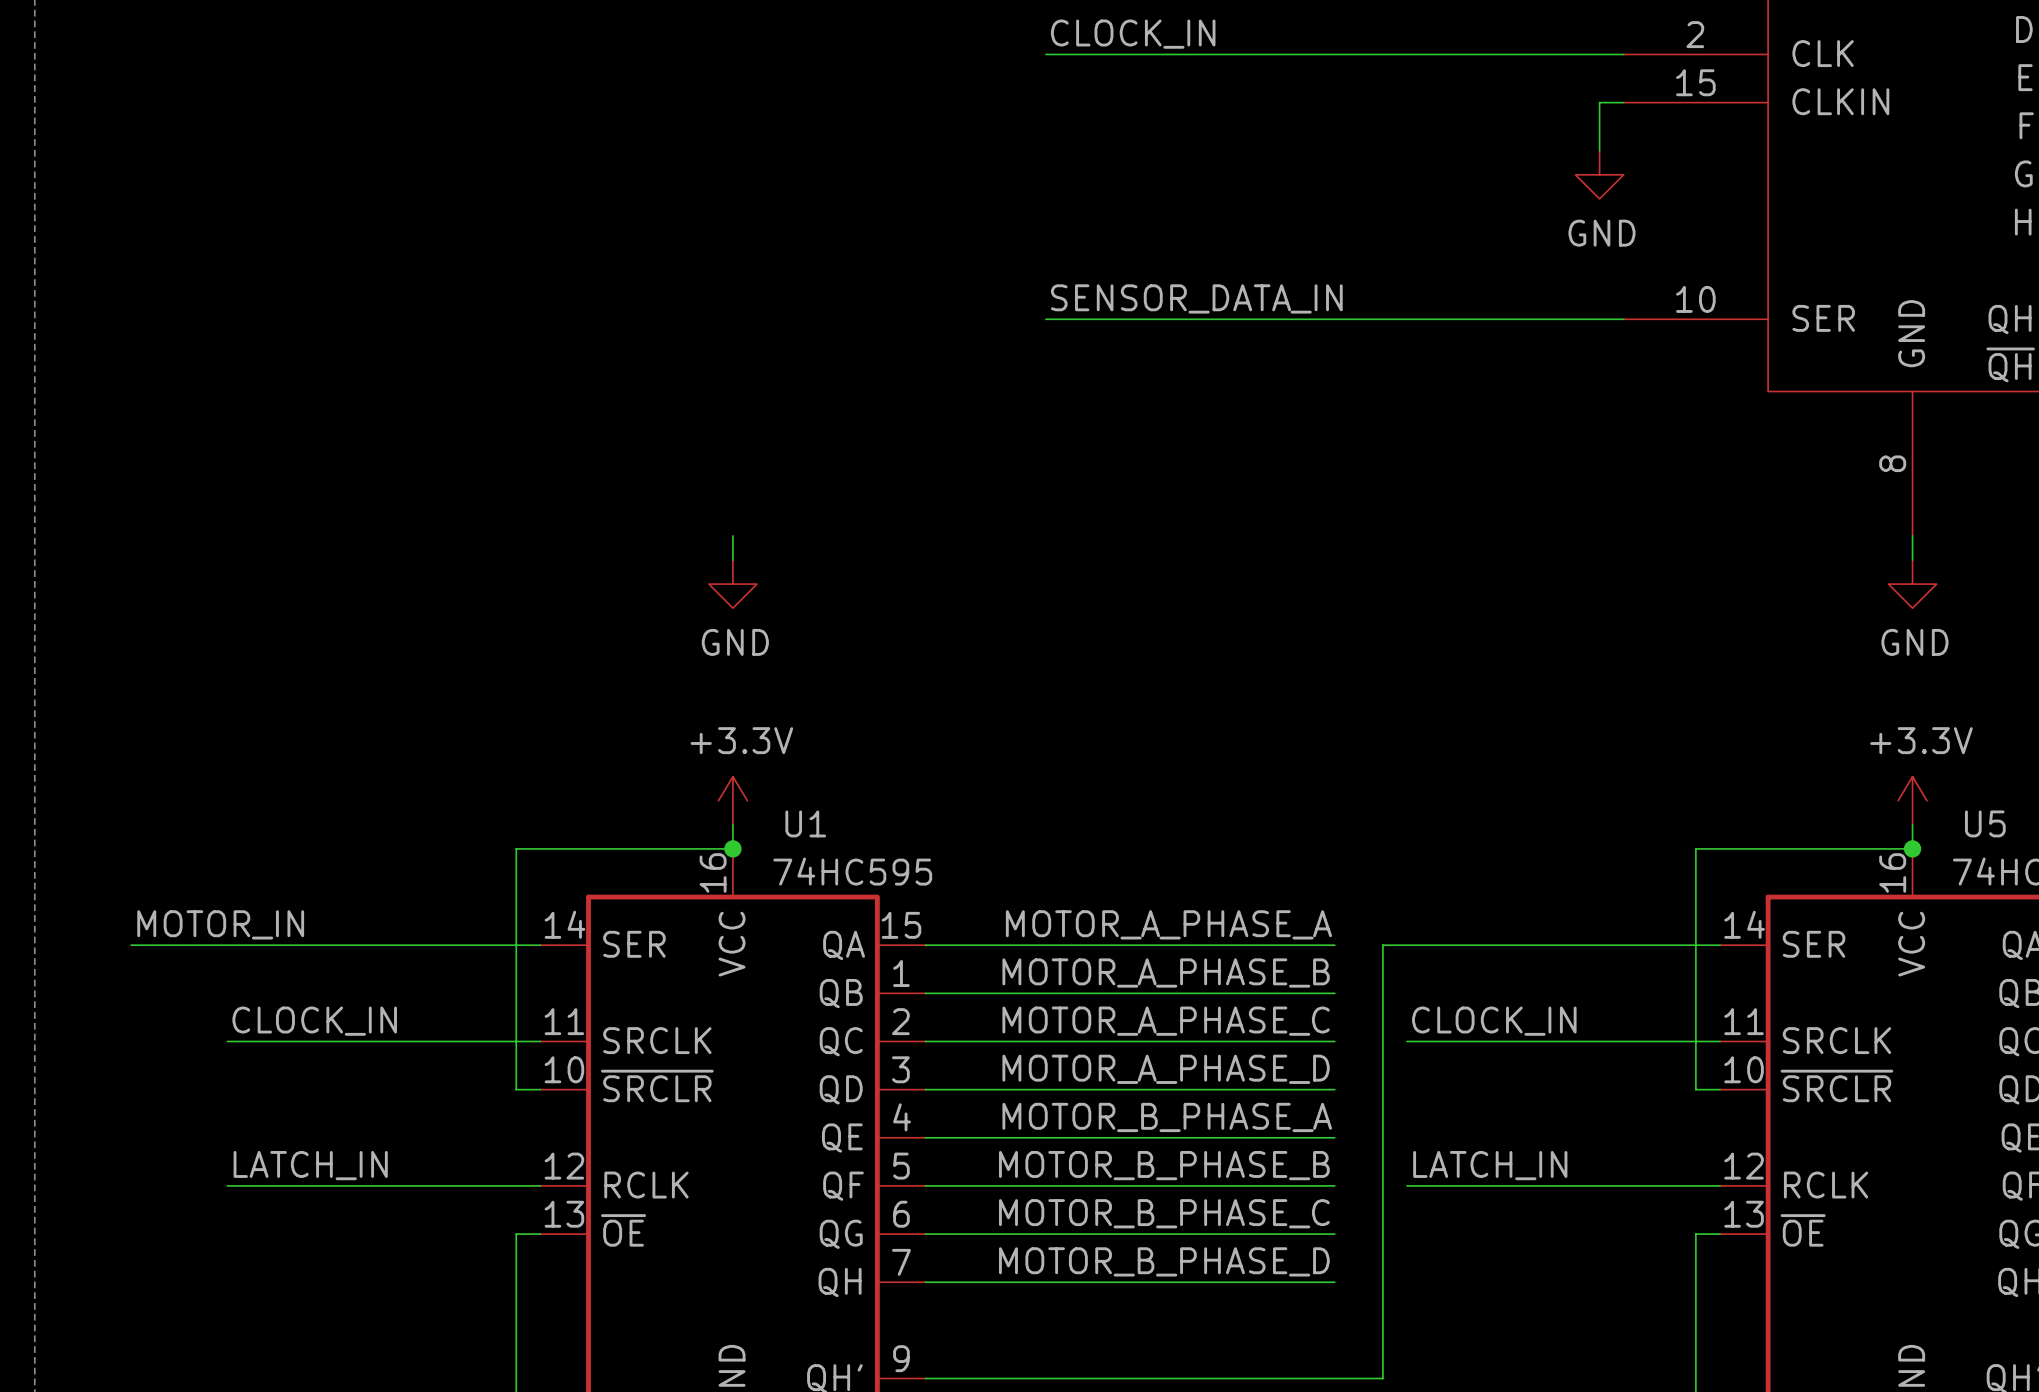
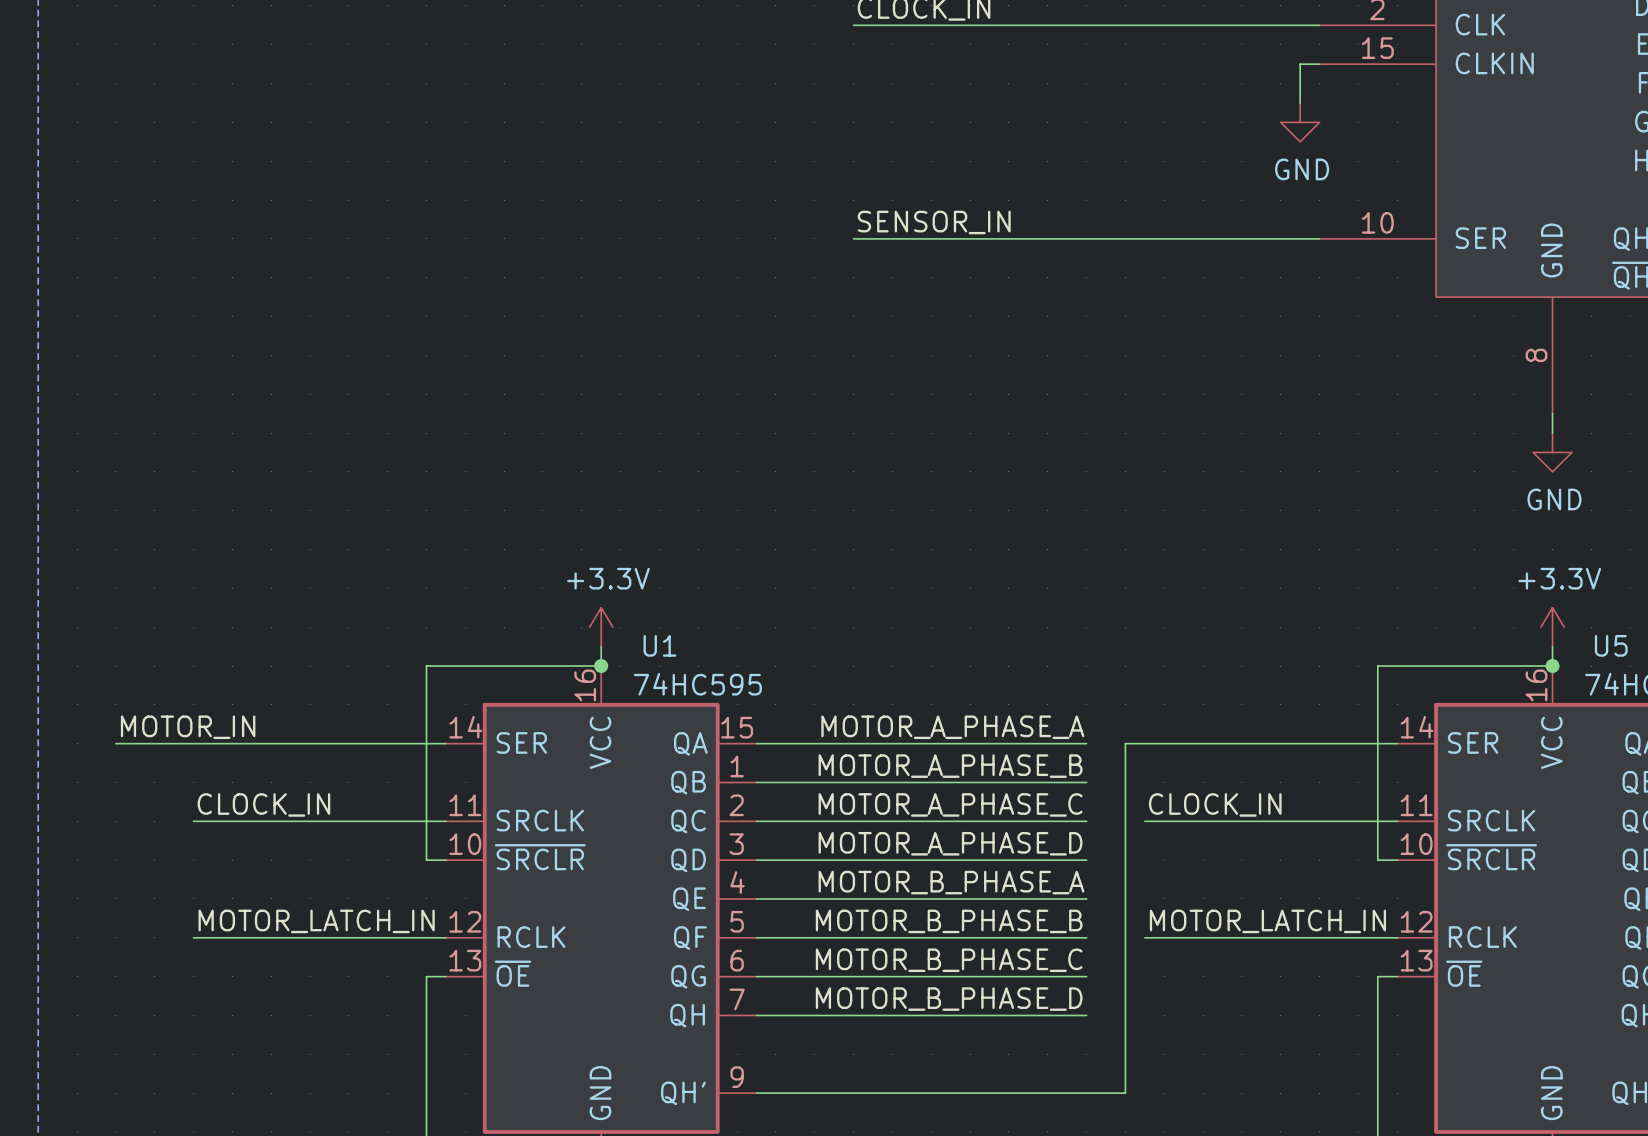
label: SENSOR_DATA_IN (1196, 298) -> SENSOR_IN (934, 222)
wire: (732, 535) (732, 560) -> none
power symbol: GND (732, 584) -> none
label: LATCH_IN (310, 1165) -> MOTOR_LATCH_IN (316, 921)
label: LATCH_IN (1490, 1165) -> MOTOR_LATCH_IN (1267, 921)

